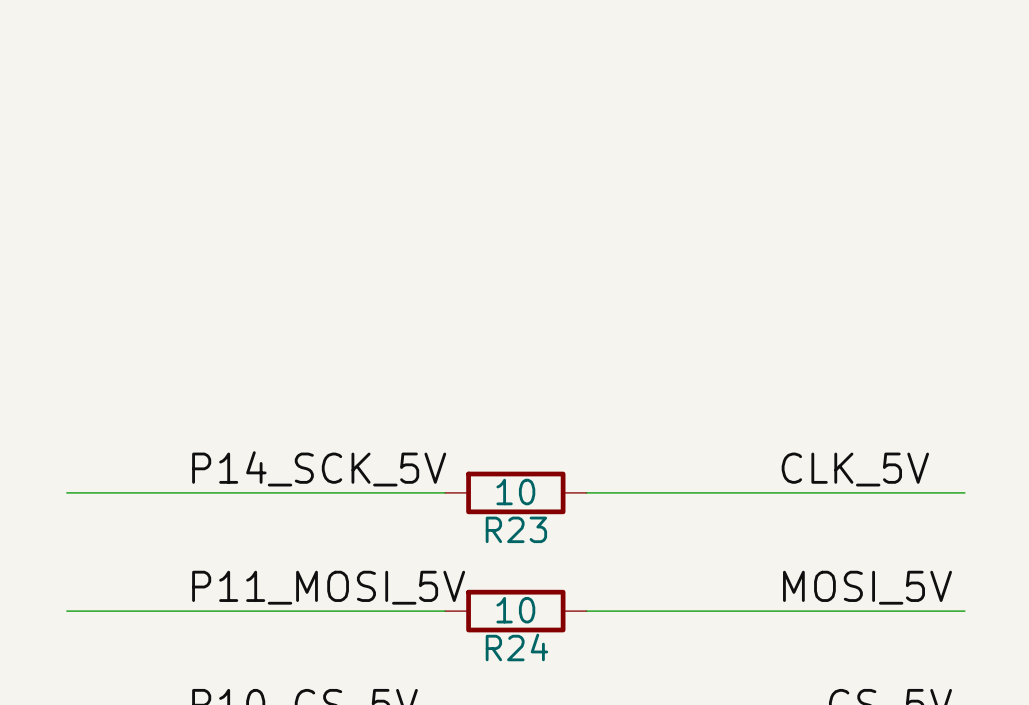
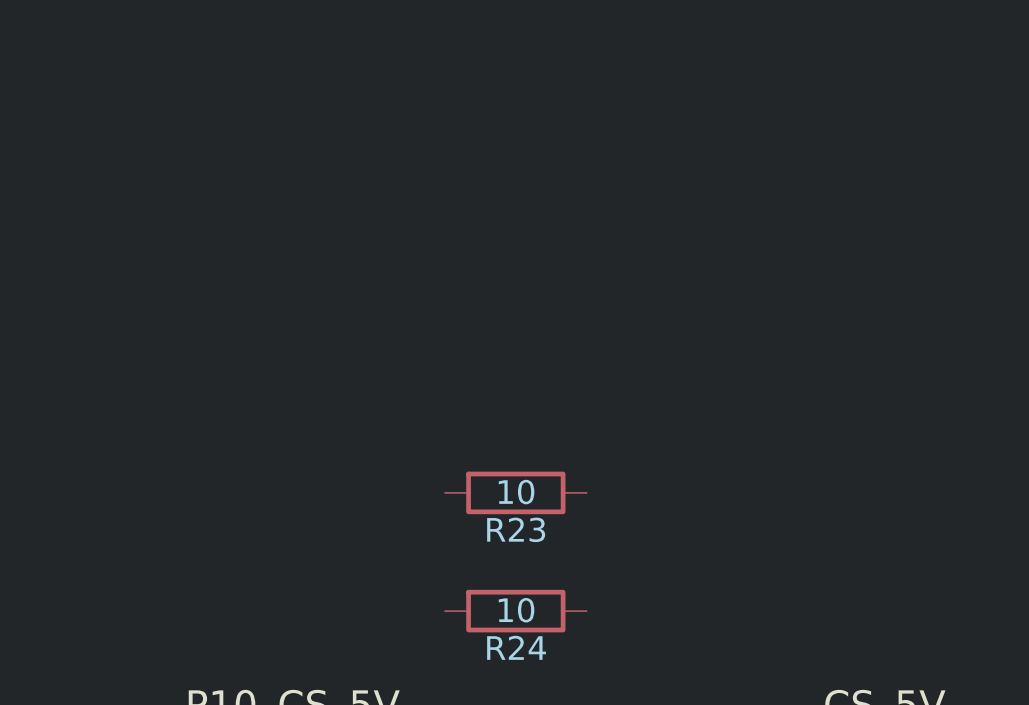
label: P14_SCK_5V (319, 468) -> none
label: CLK_5V (855, 469) -> none
wire: (66, 492) (444, 492) -> none
wire: (586, 492) (964, 492) -> none
label: P11_MOSI_5V (328, 587) -> none
label: MOSI_5V (867, 587) -> none
wire: (66, 611) (444, 611) -> none
wire: (586, 611) (964, 611) -> none

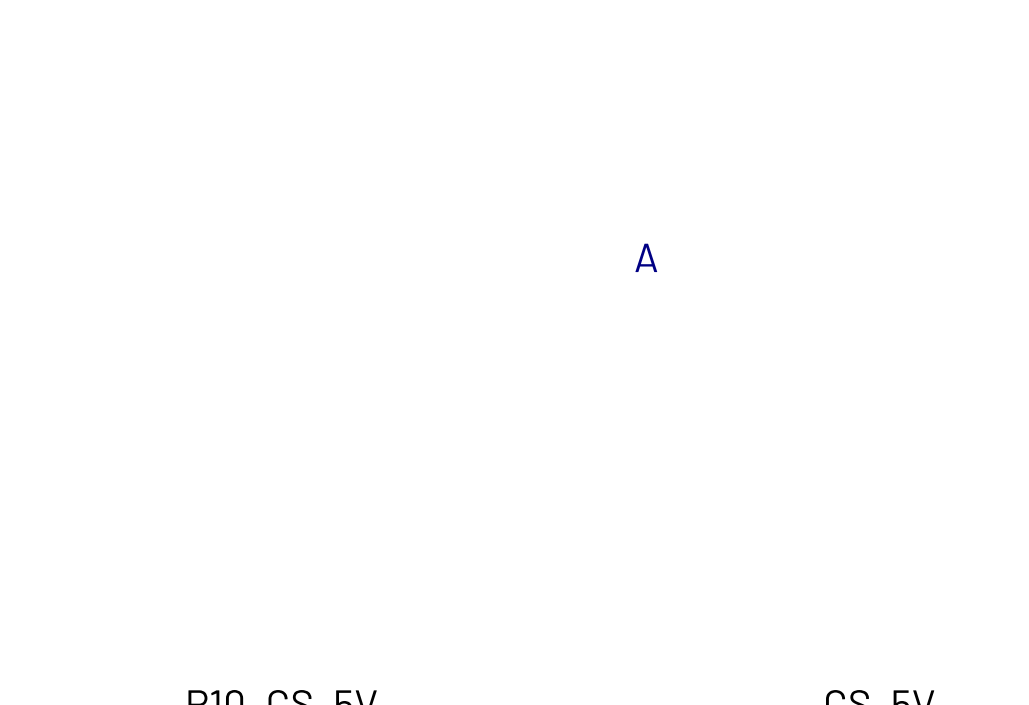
text: none -> A (646, 257)
R23: 10 (515, 492) -> none
R24: 10 (515, 611) -> none

